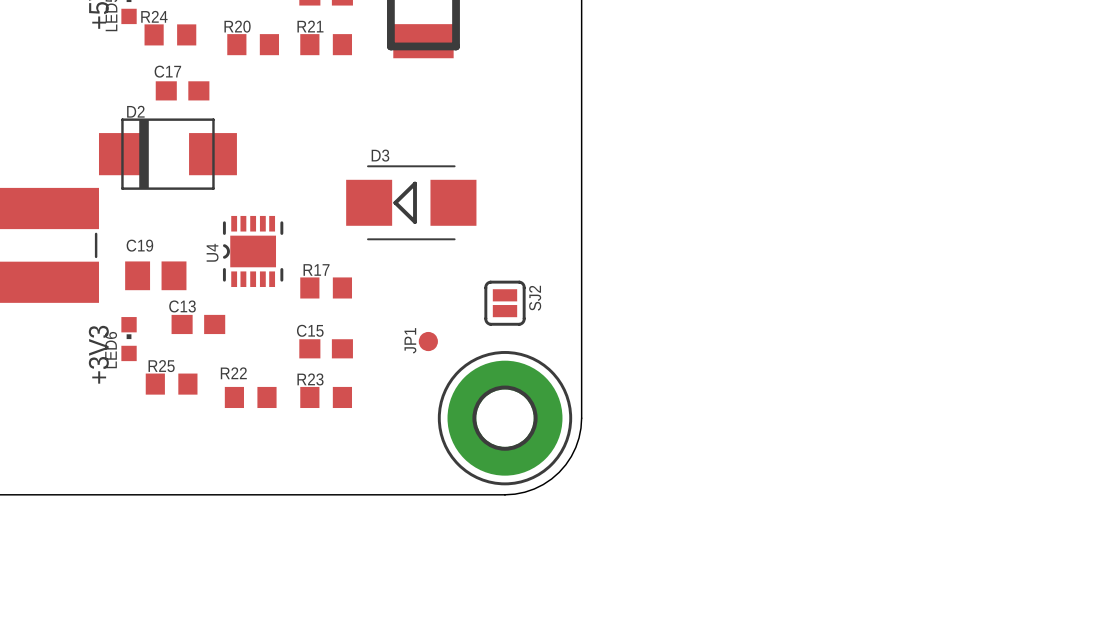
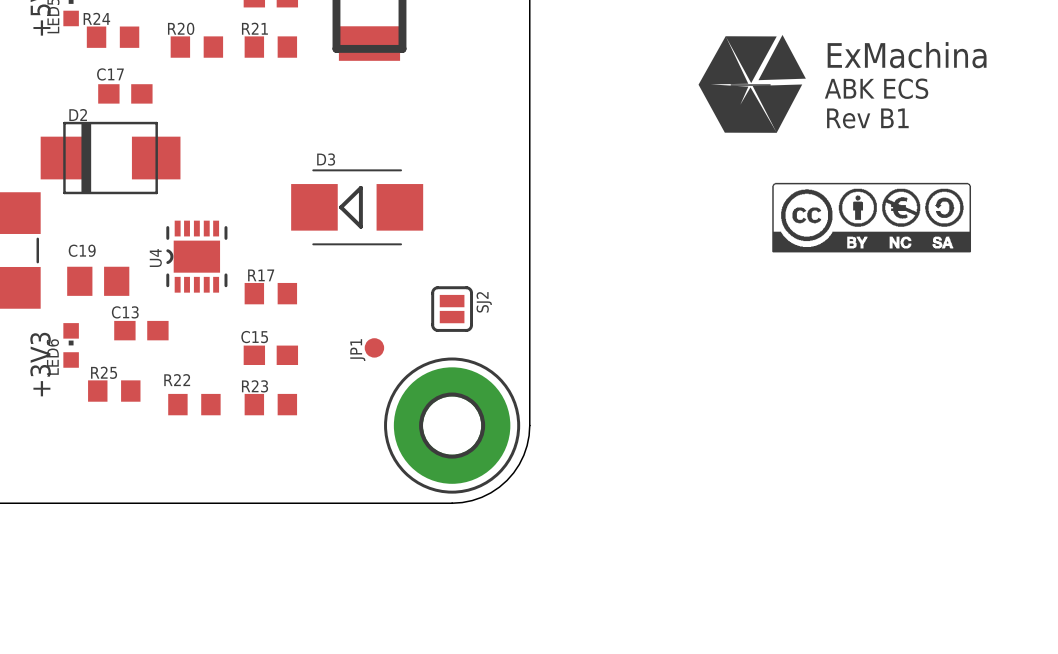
drawing: none -> [698, 34, 806, 133]
text: none -> ABK ECS (876, 88)
text: none -> Rev B1 (867, 118)
drawing: none -> [772, 182, 972, 253]

